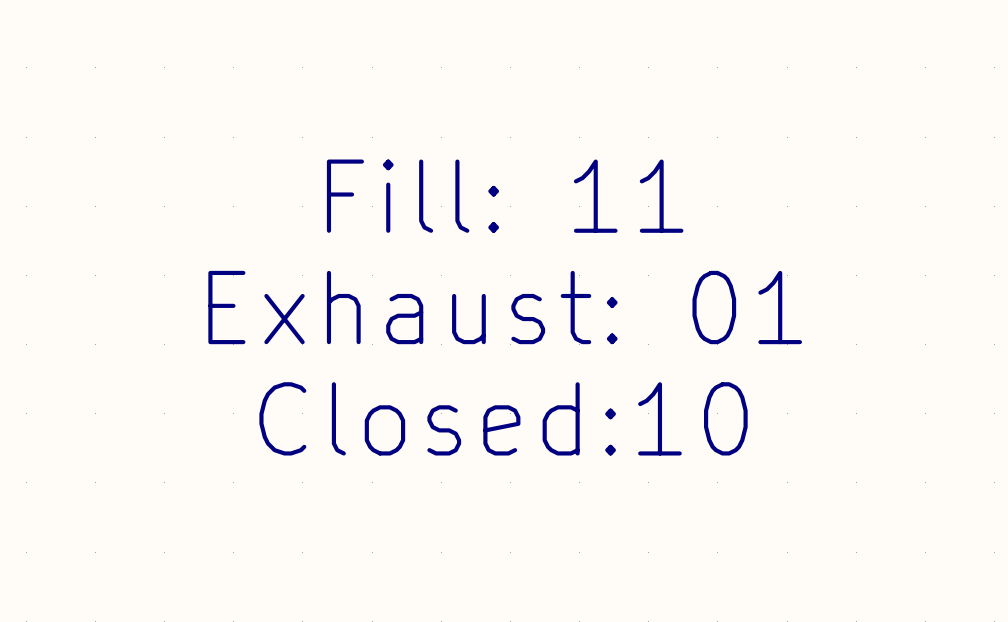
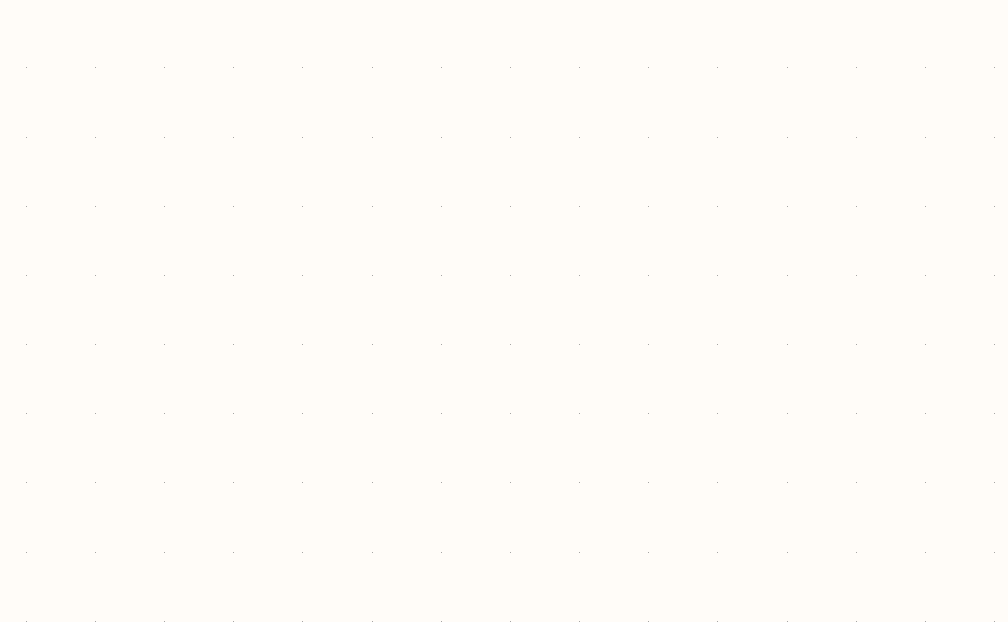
text: Fill: 11 (505, 196) -> none
text: Exhaust: 01 (505, 307) -> none
text: Closed:10 (503, 418) -> none

